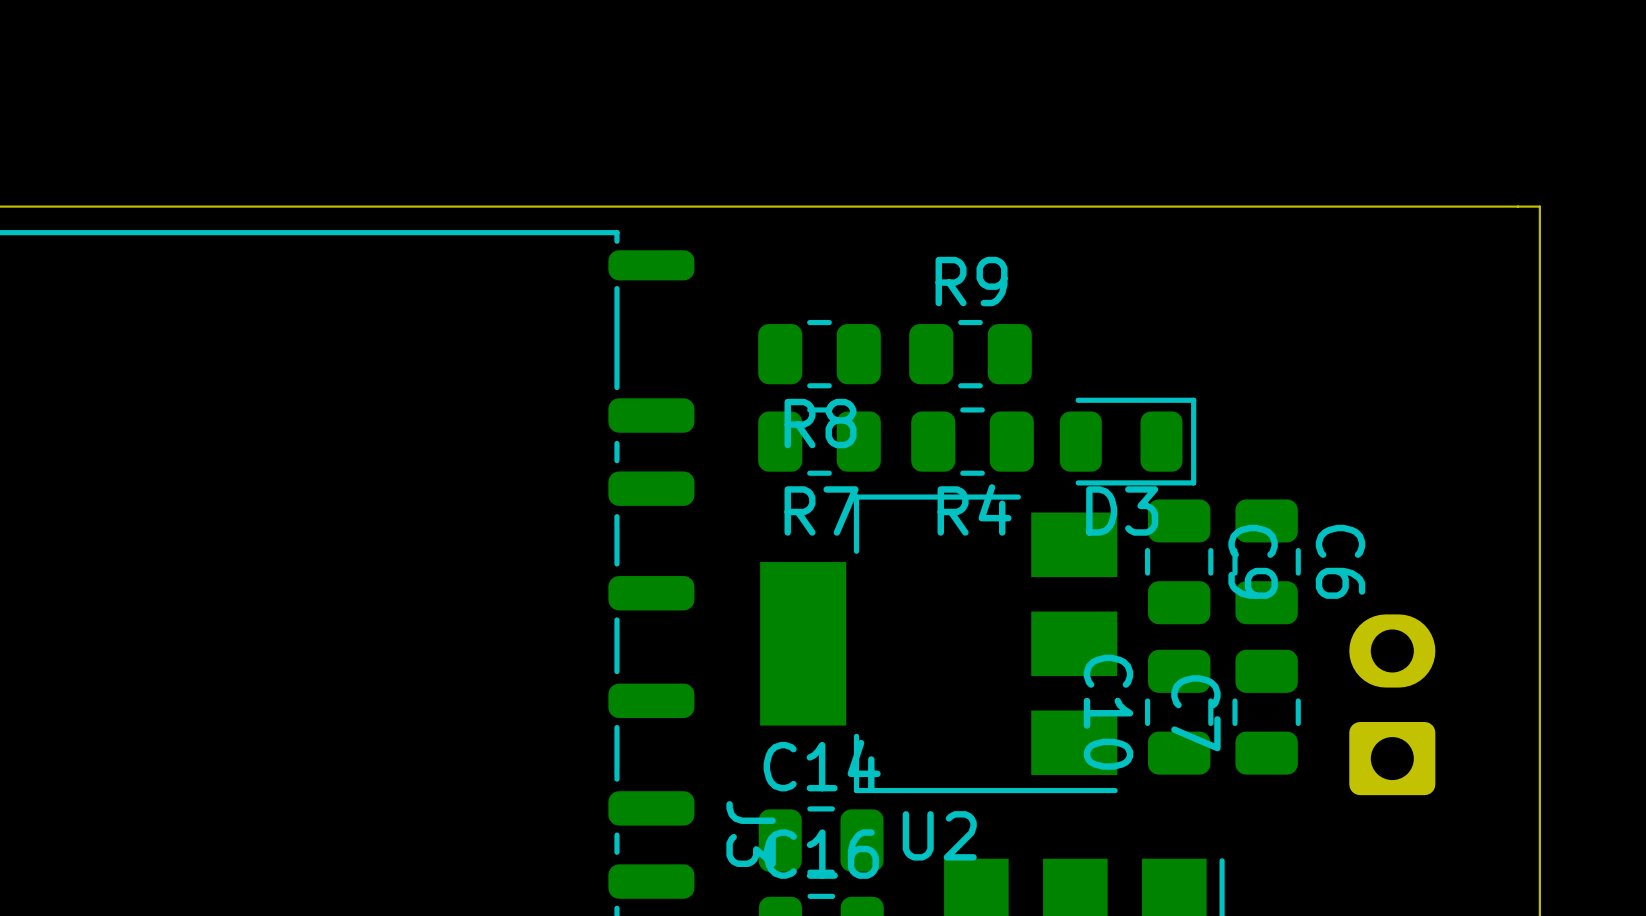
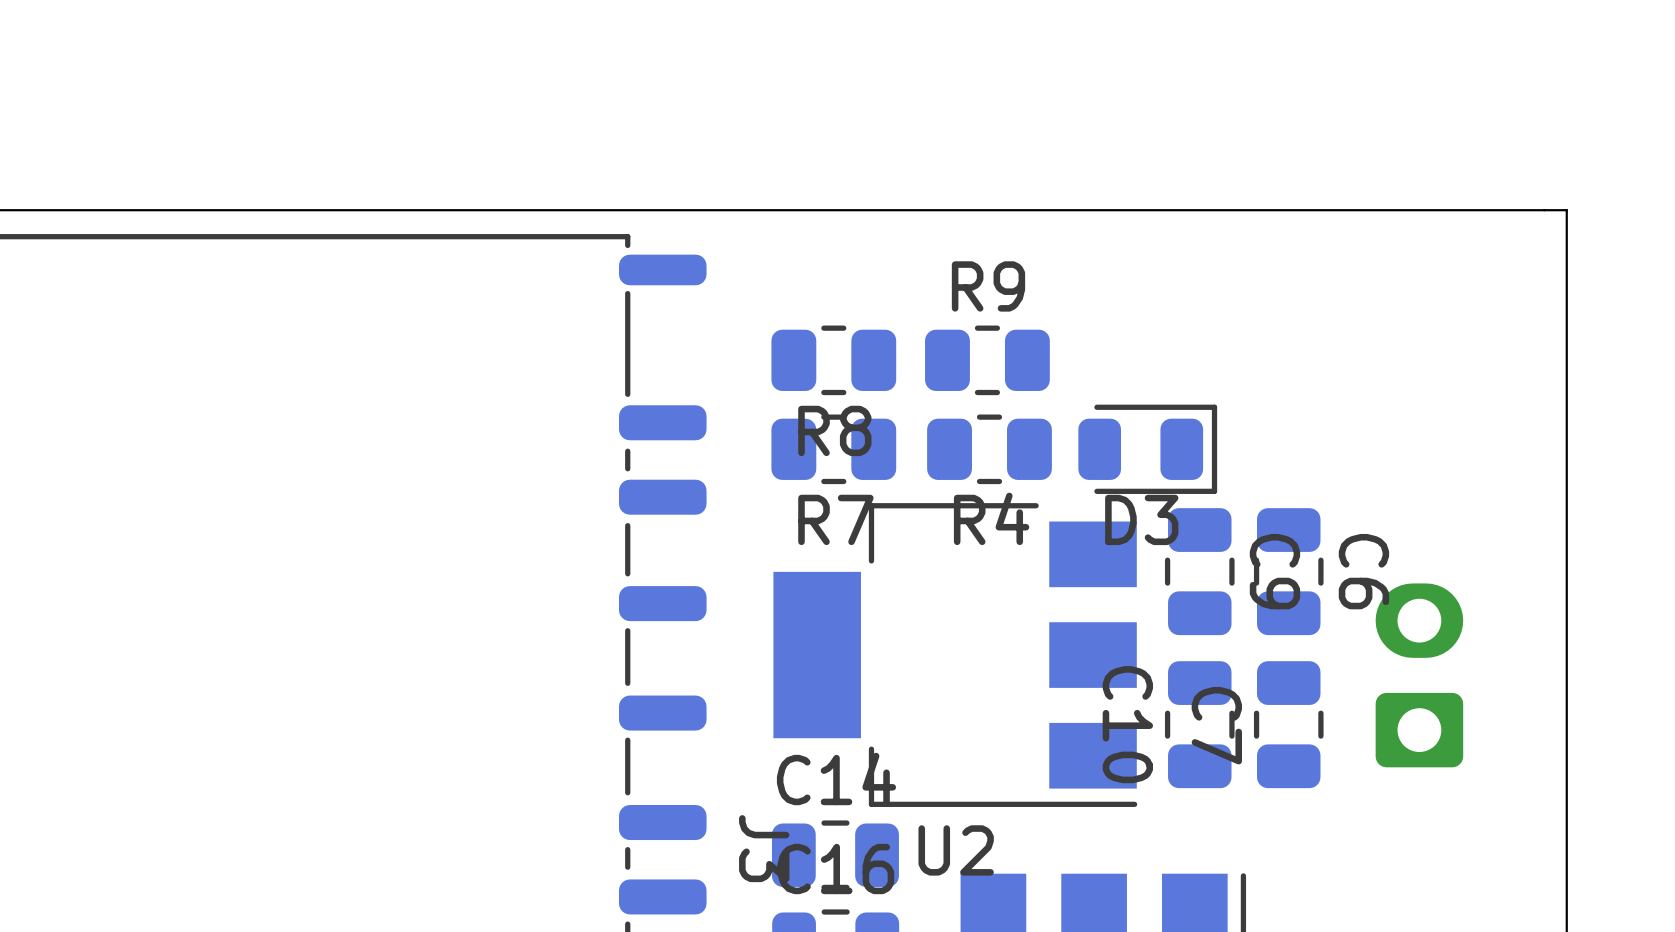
part position: (1392, 704) -> (1419, 675)

